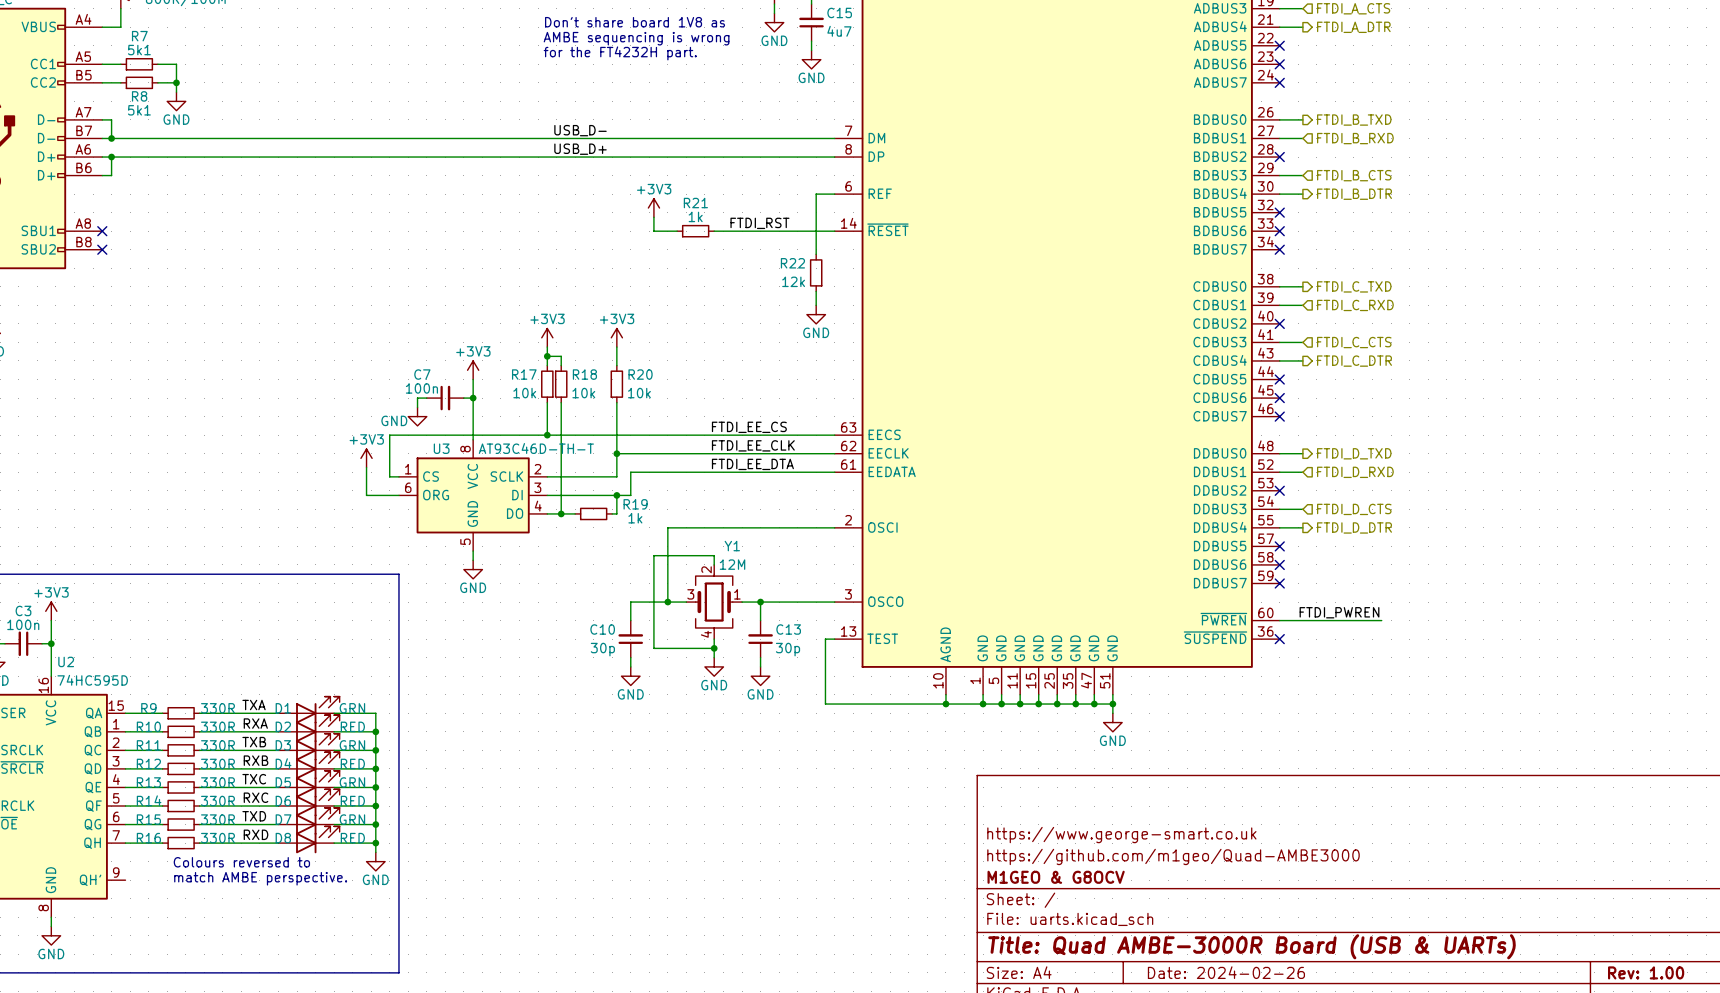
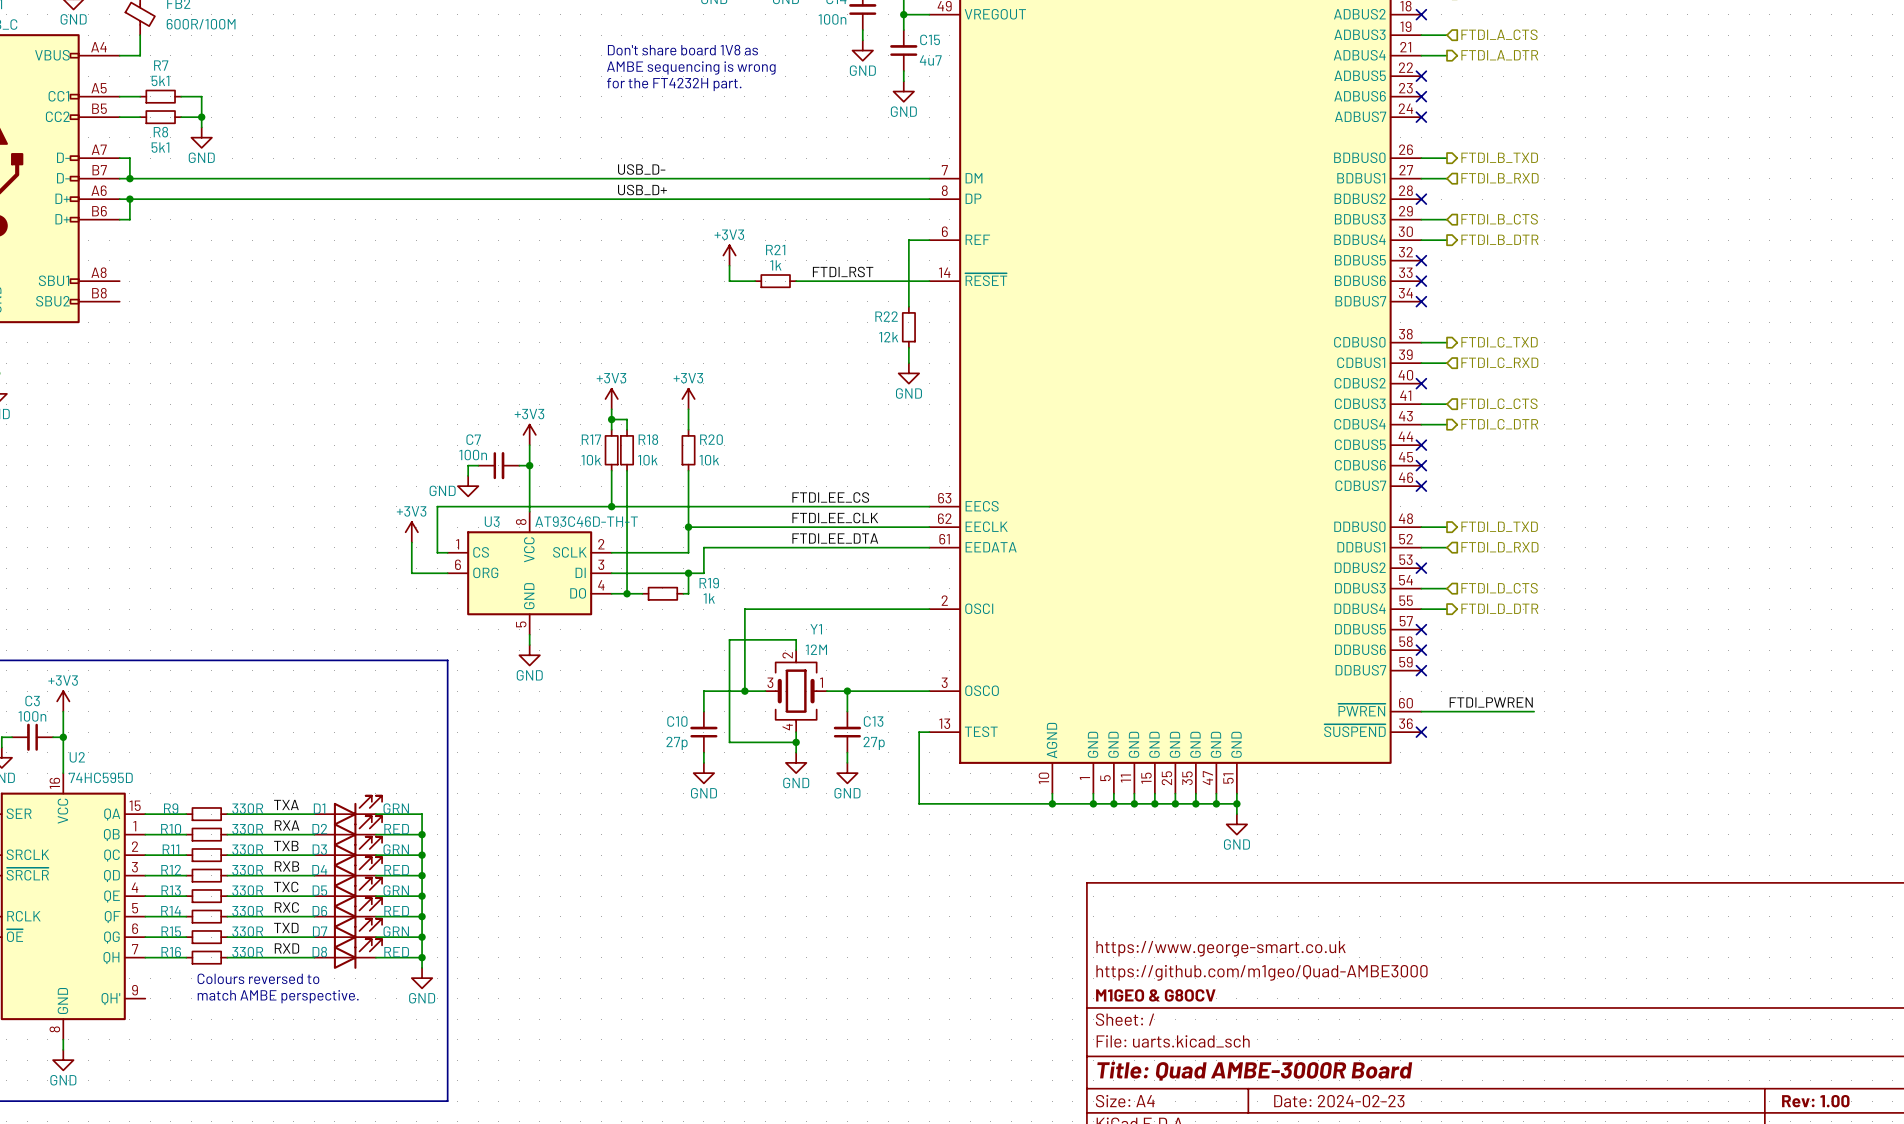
no-connect mark: (102, 231) -> none
no-connect mark: (102, 249) -> none
C10 value: 30p (602, 649) -> 27p (677, 743)
C13 value: 30p (788, 649) -> 27p (874, 743)
title block: Title: Quad AMBE-3000R Board (USB & UARTs) (1251, 946) -> Title: Quad AMBE-3000R Board (1254, 1071)
title block: Date: 2024-02-26 (1226, 972) -> Date: 2024-02-23 (1339, 1101)

